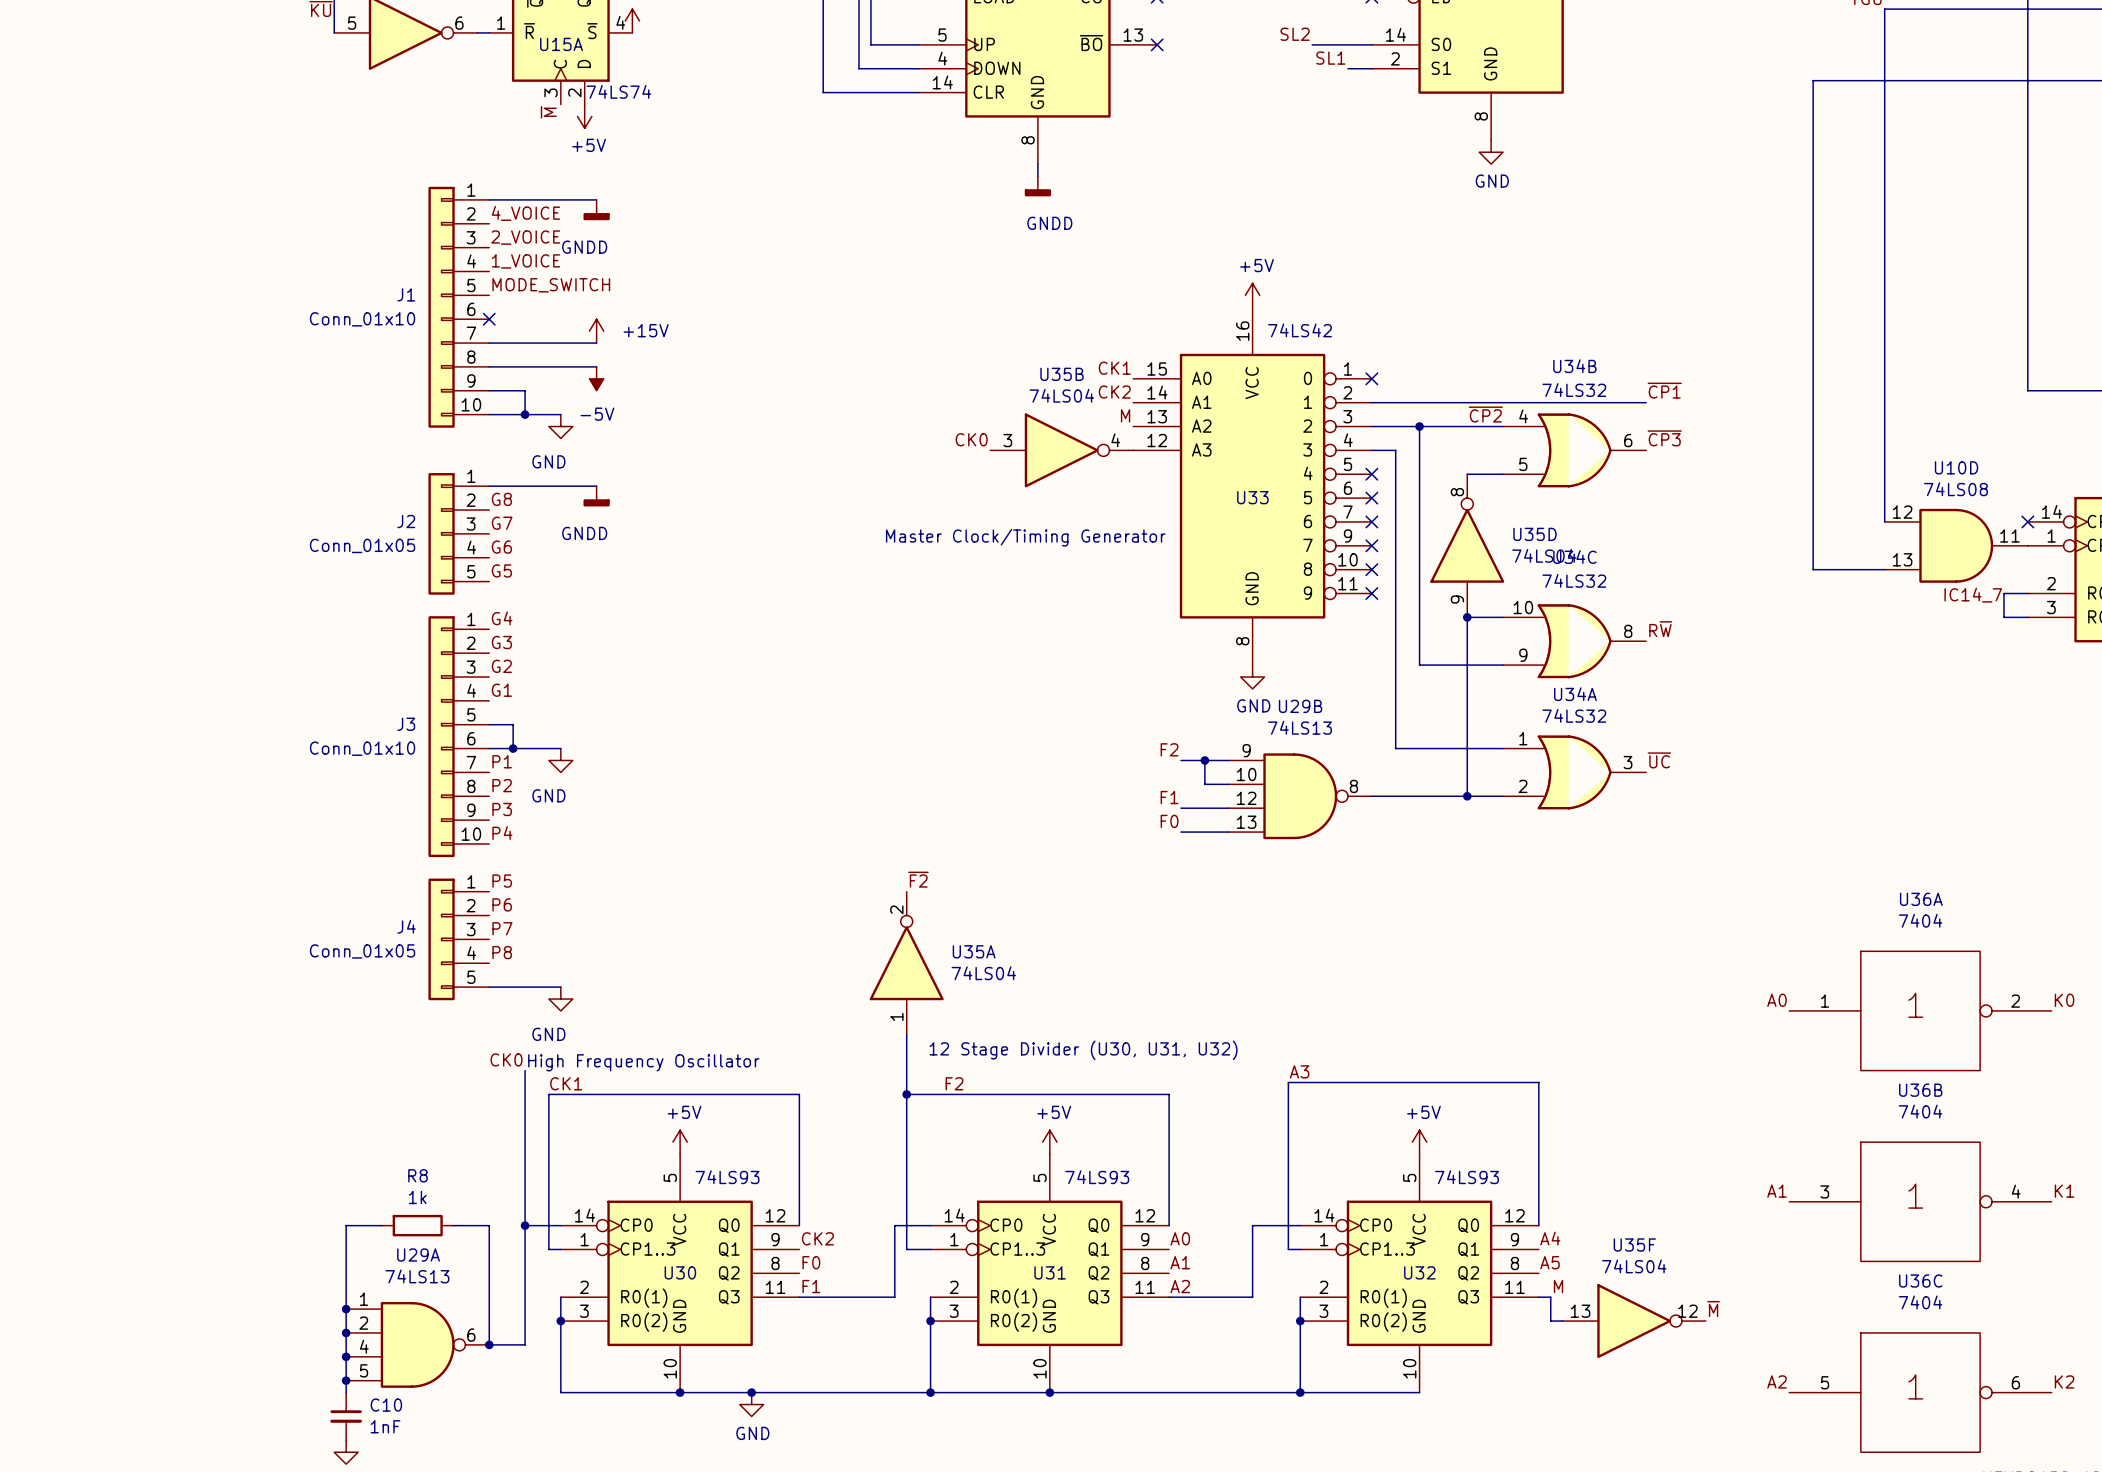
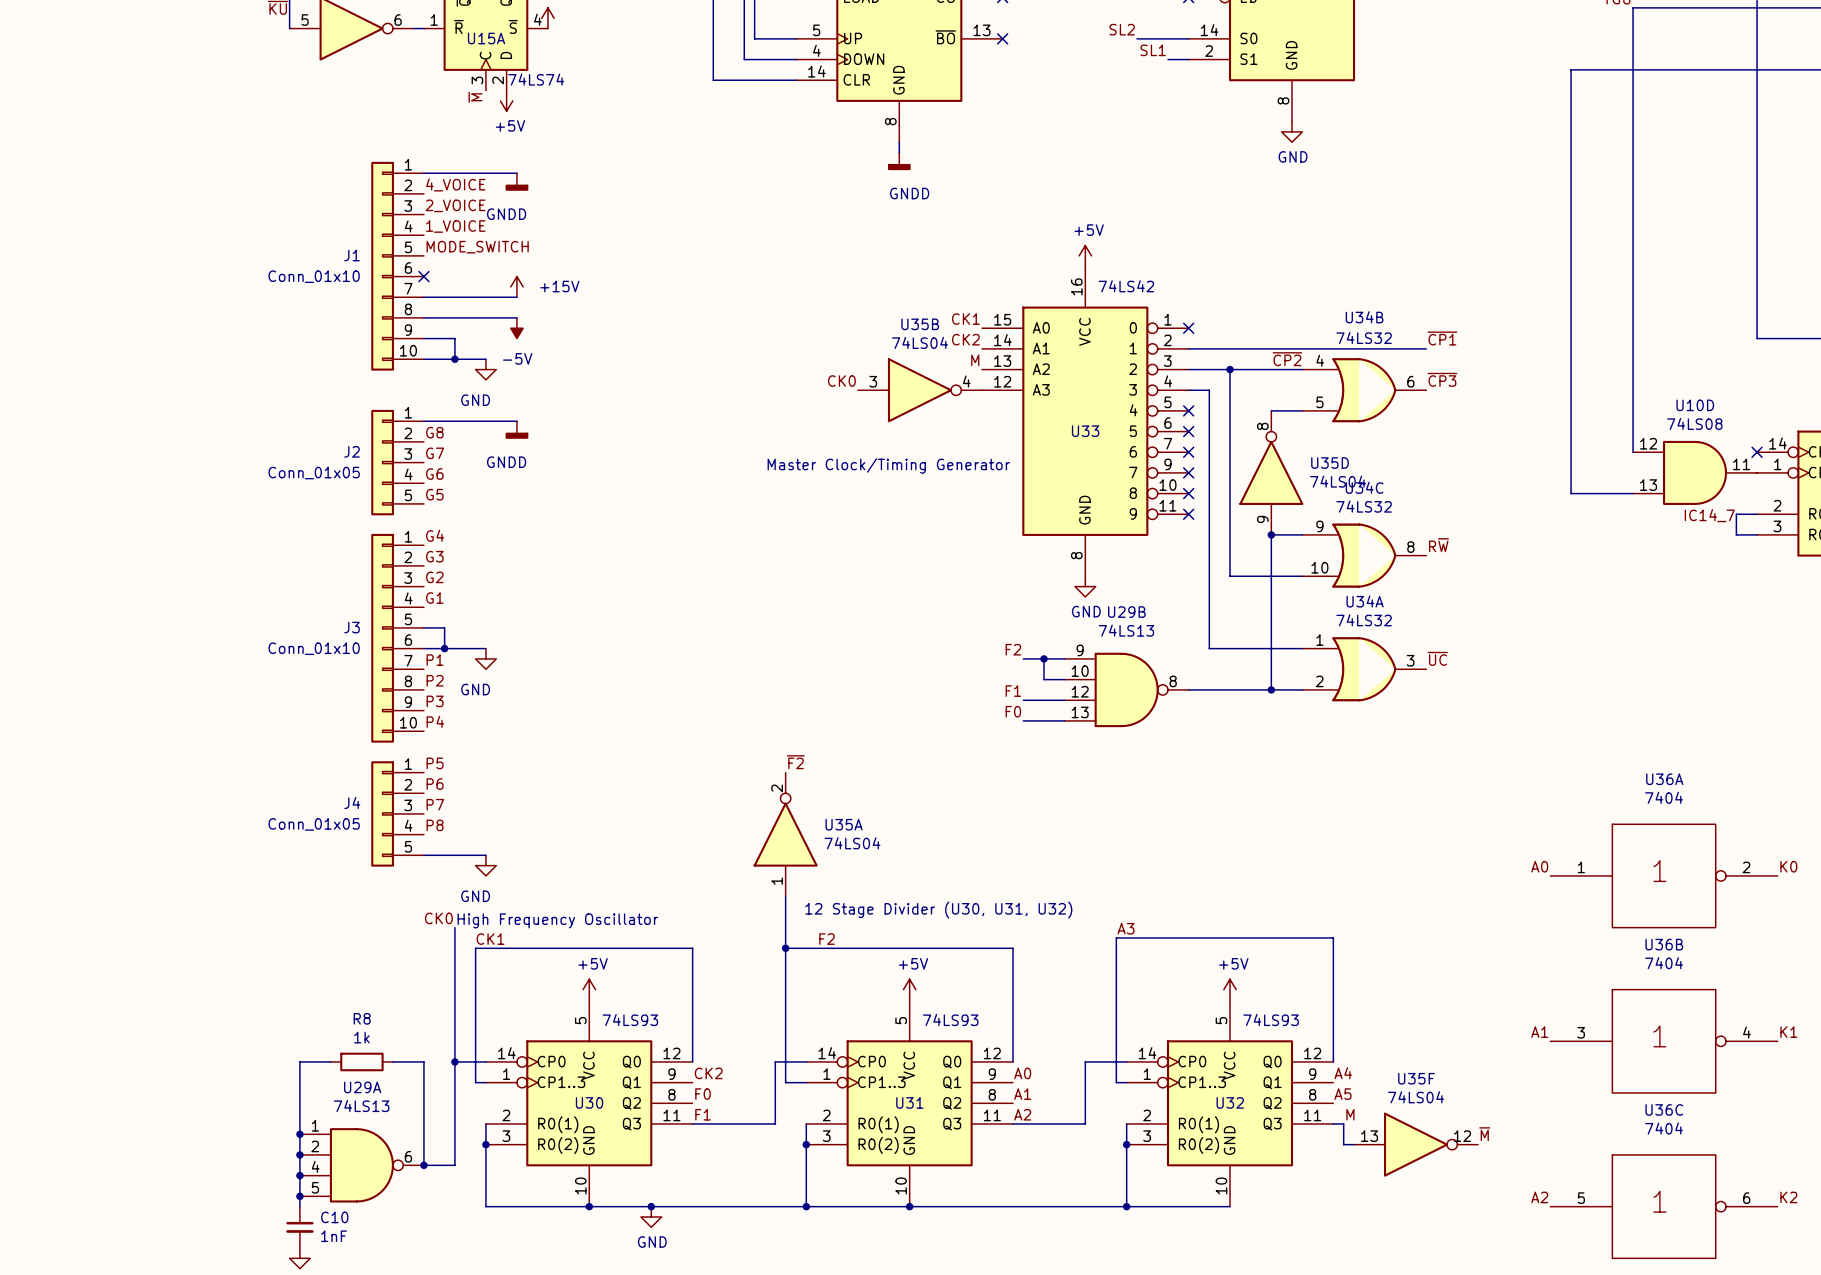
U34C flip: as is (1574, 641) -> up-down (1364, 555)

